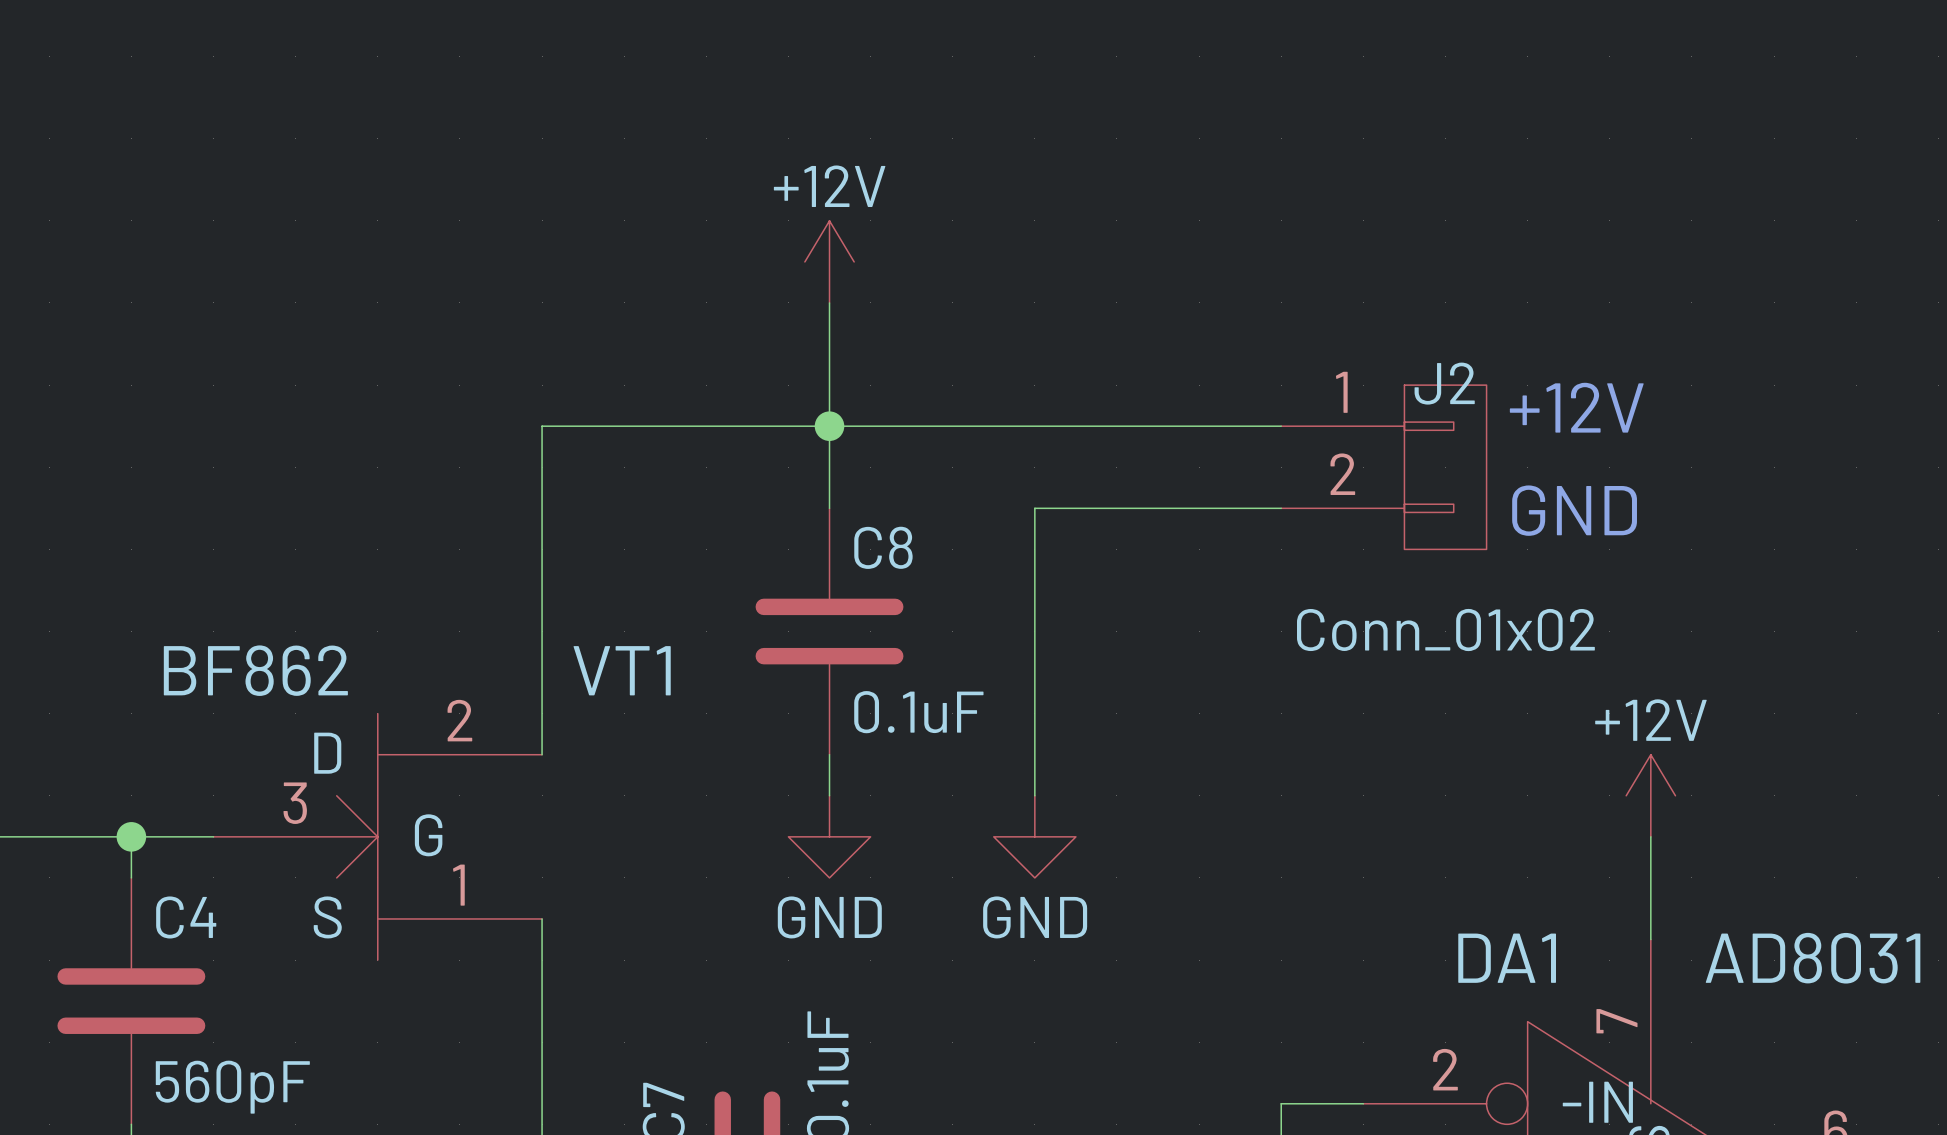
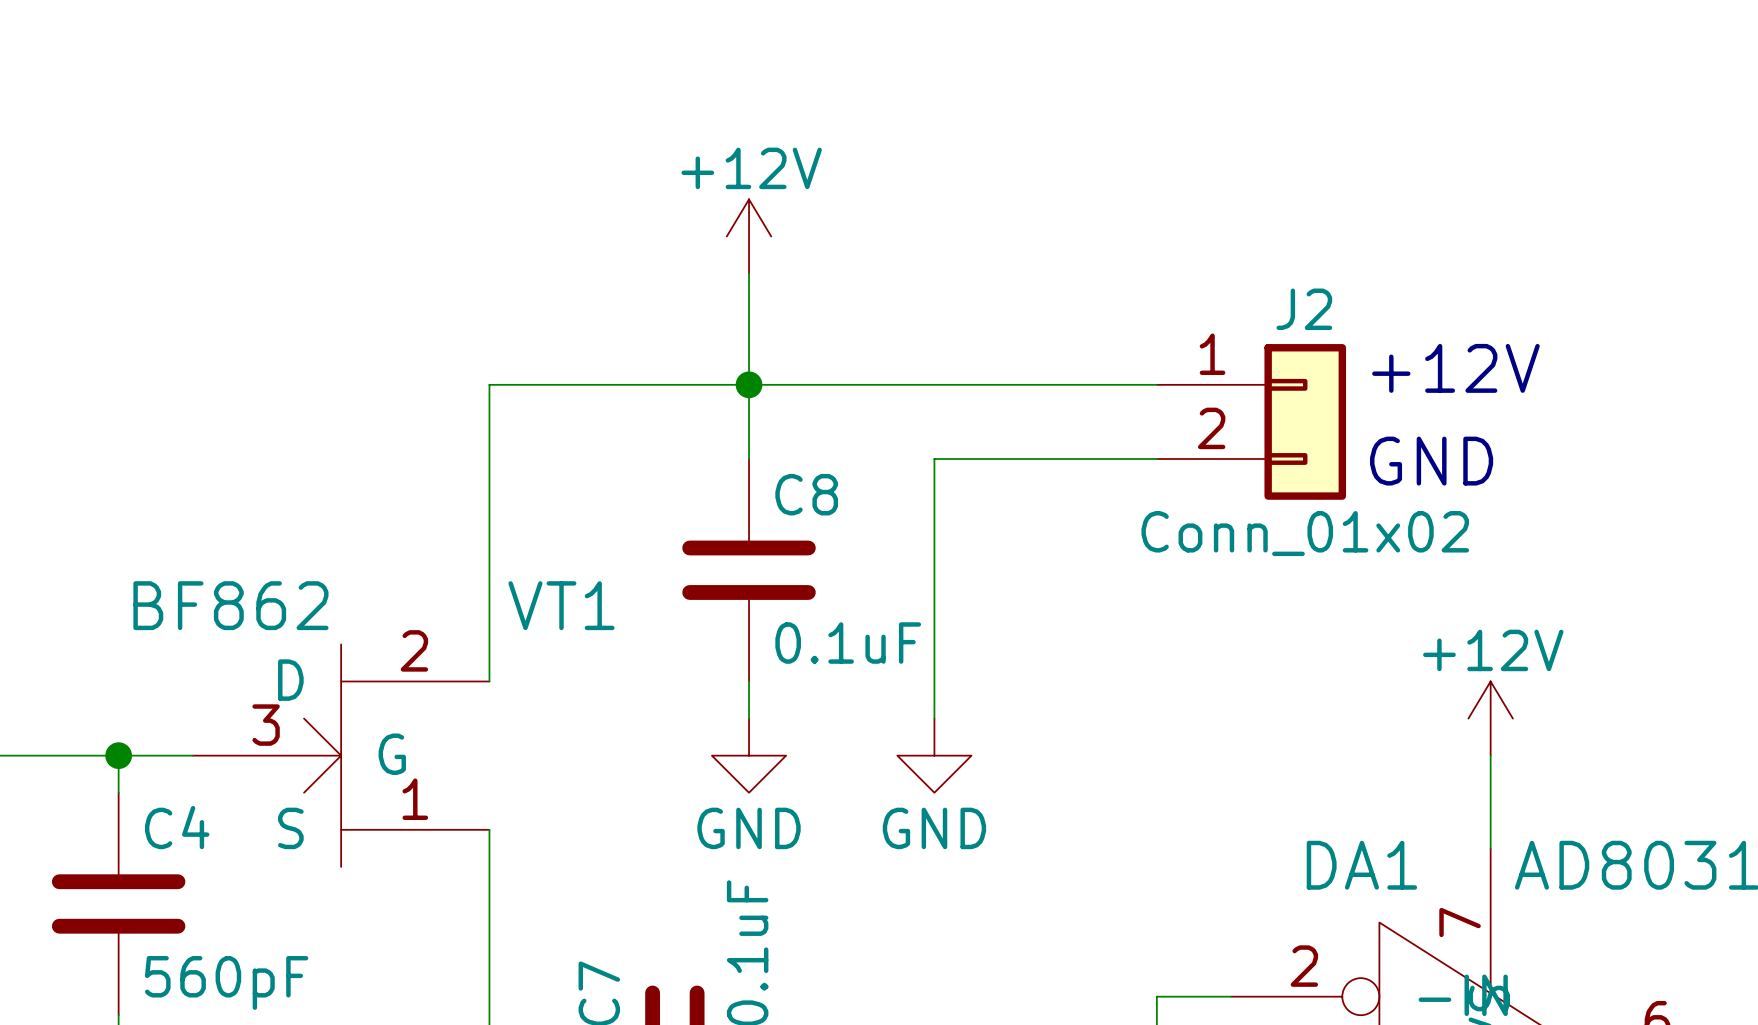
J2 symbol: [1281, 385, 1487, 550] -> [1156, 344, 1347, 500]

